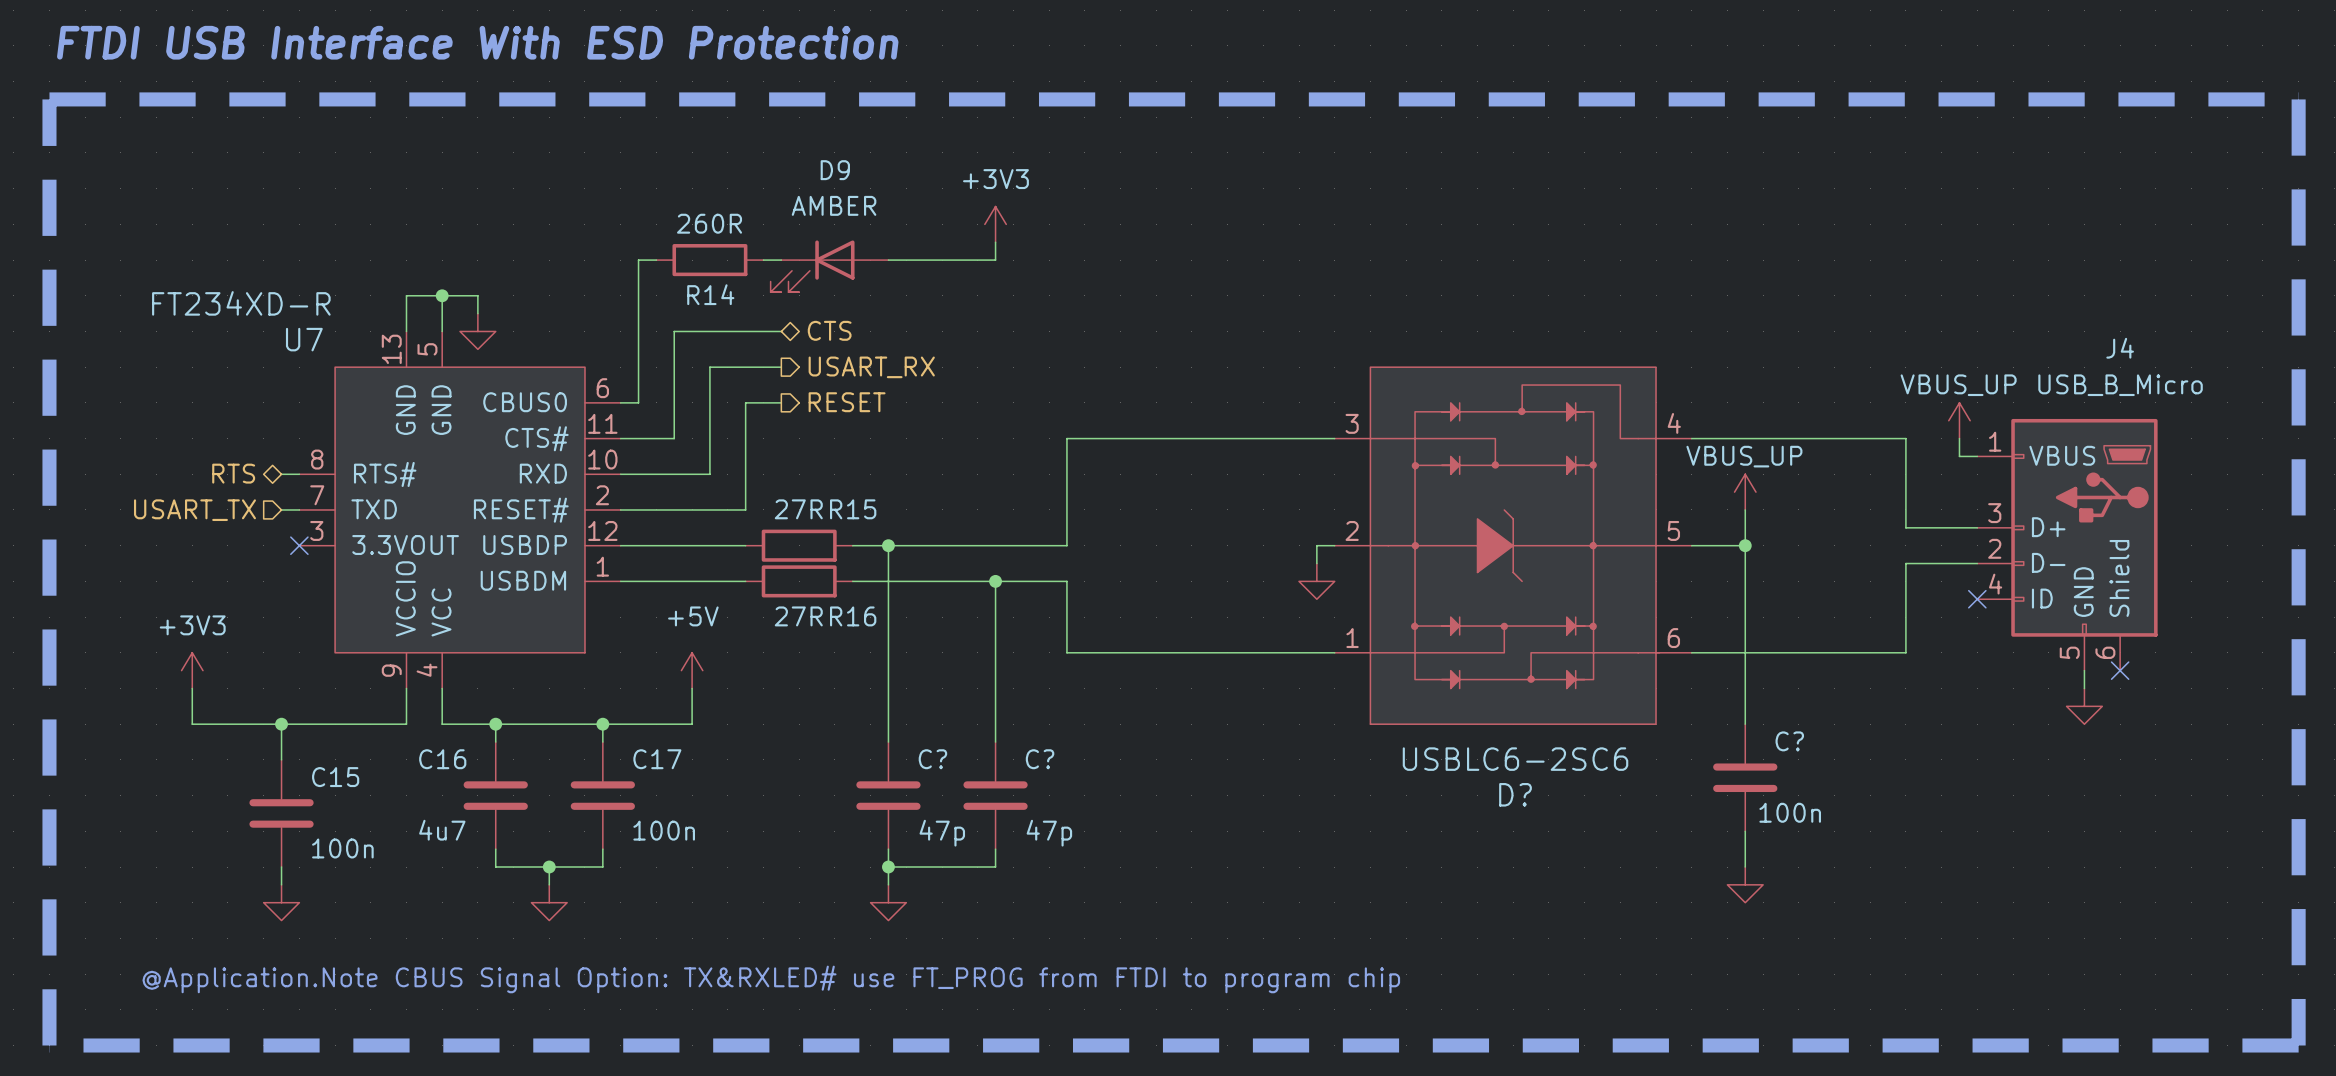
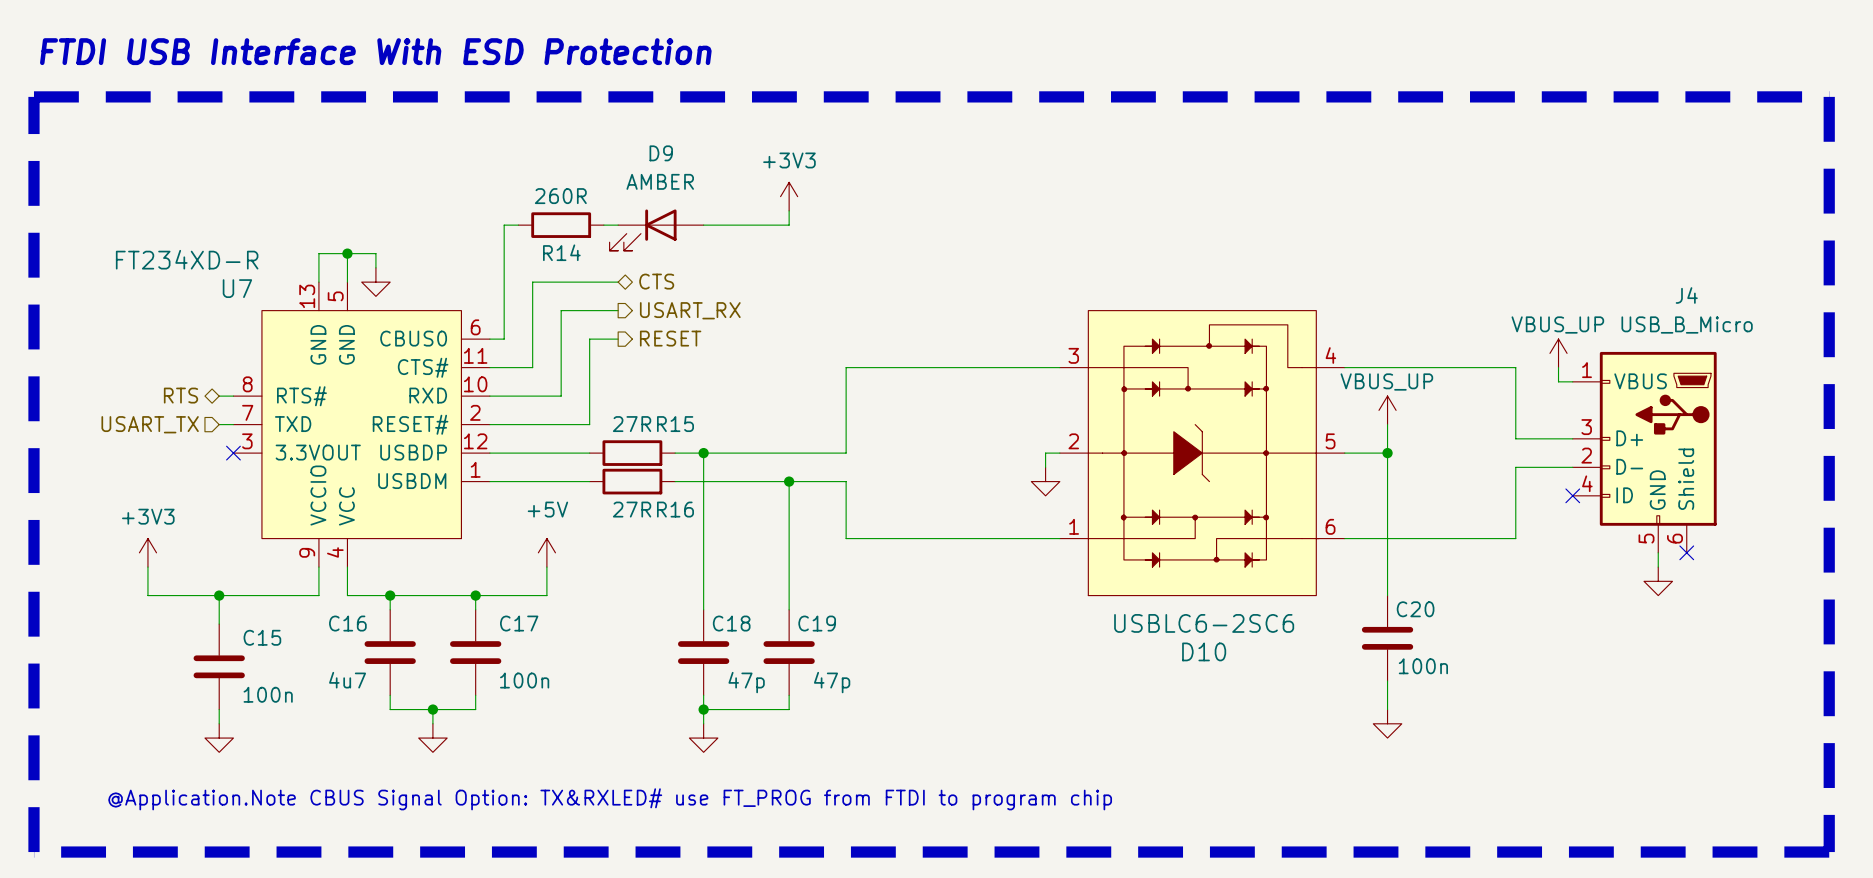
C? name: C? (1789, 741) -> C20 (1415, 609)
C? name: C? (932, 759) -> C18 (731, 623)
C? name: C? (1040, 759) -> C19 (817, 623)
D? name: D? (1515, 794) -> D10 (1204, 651)

